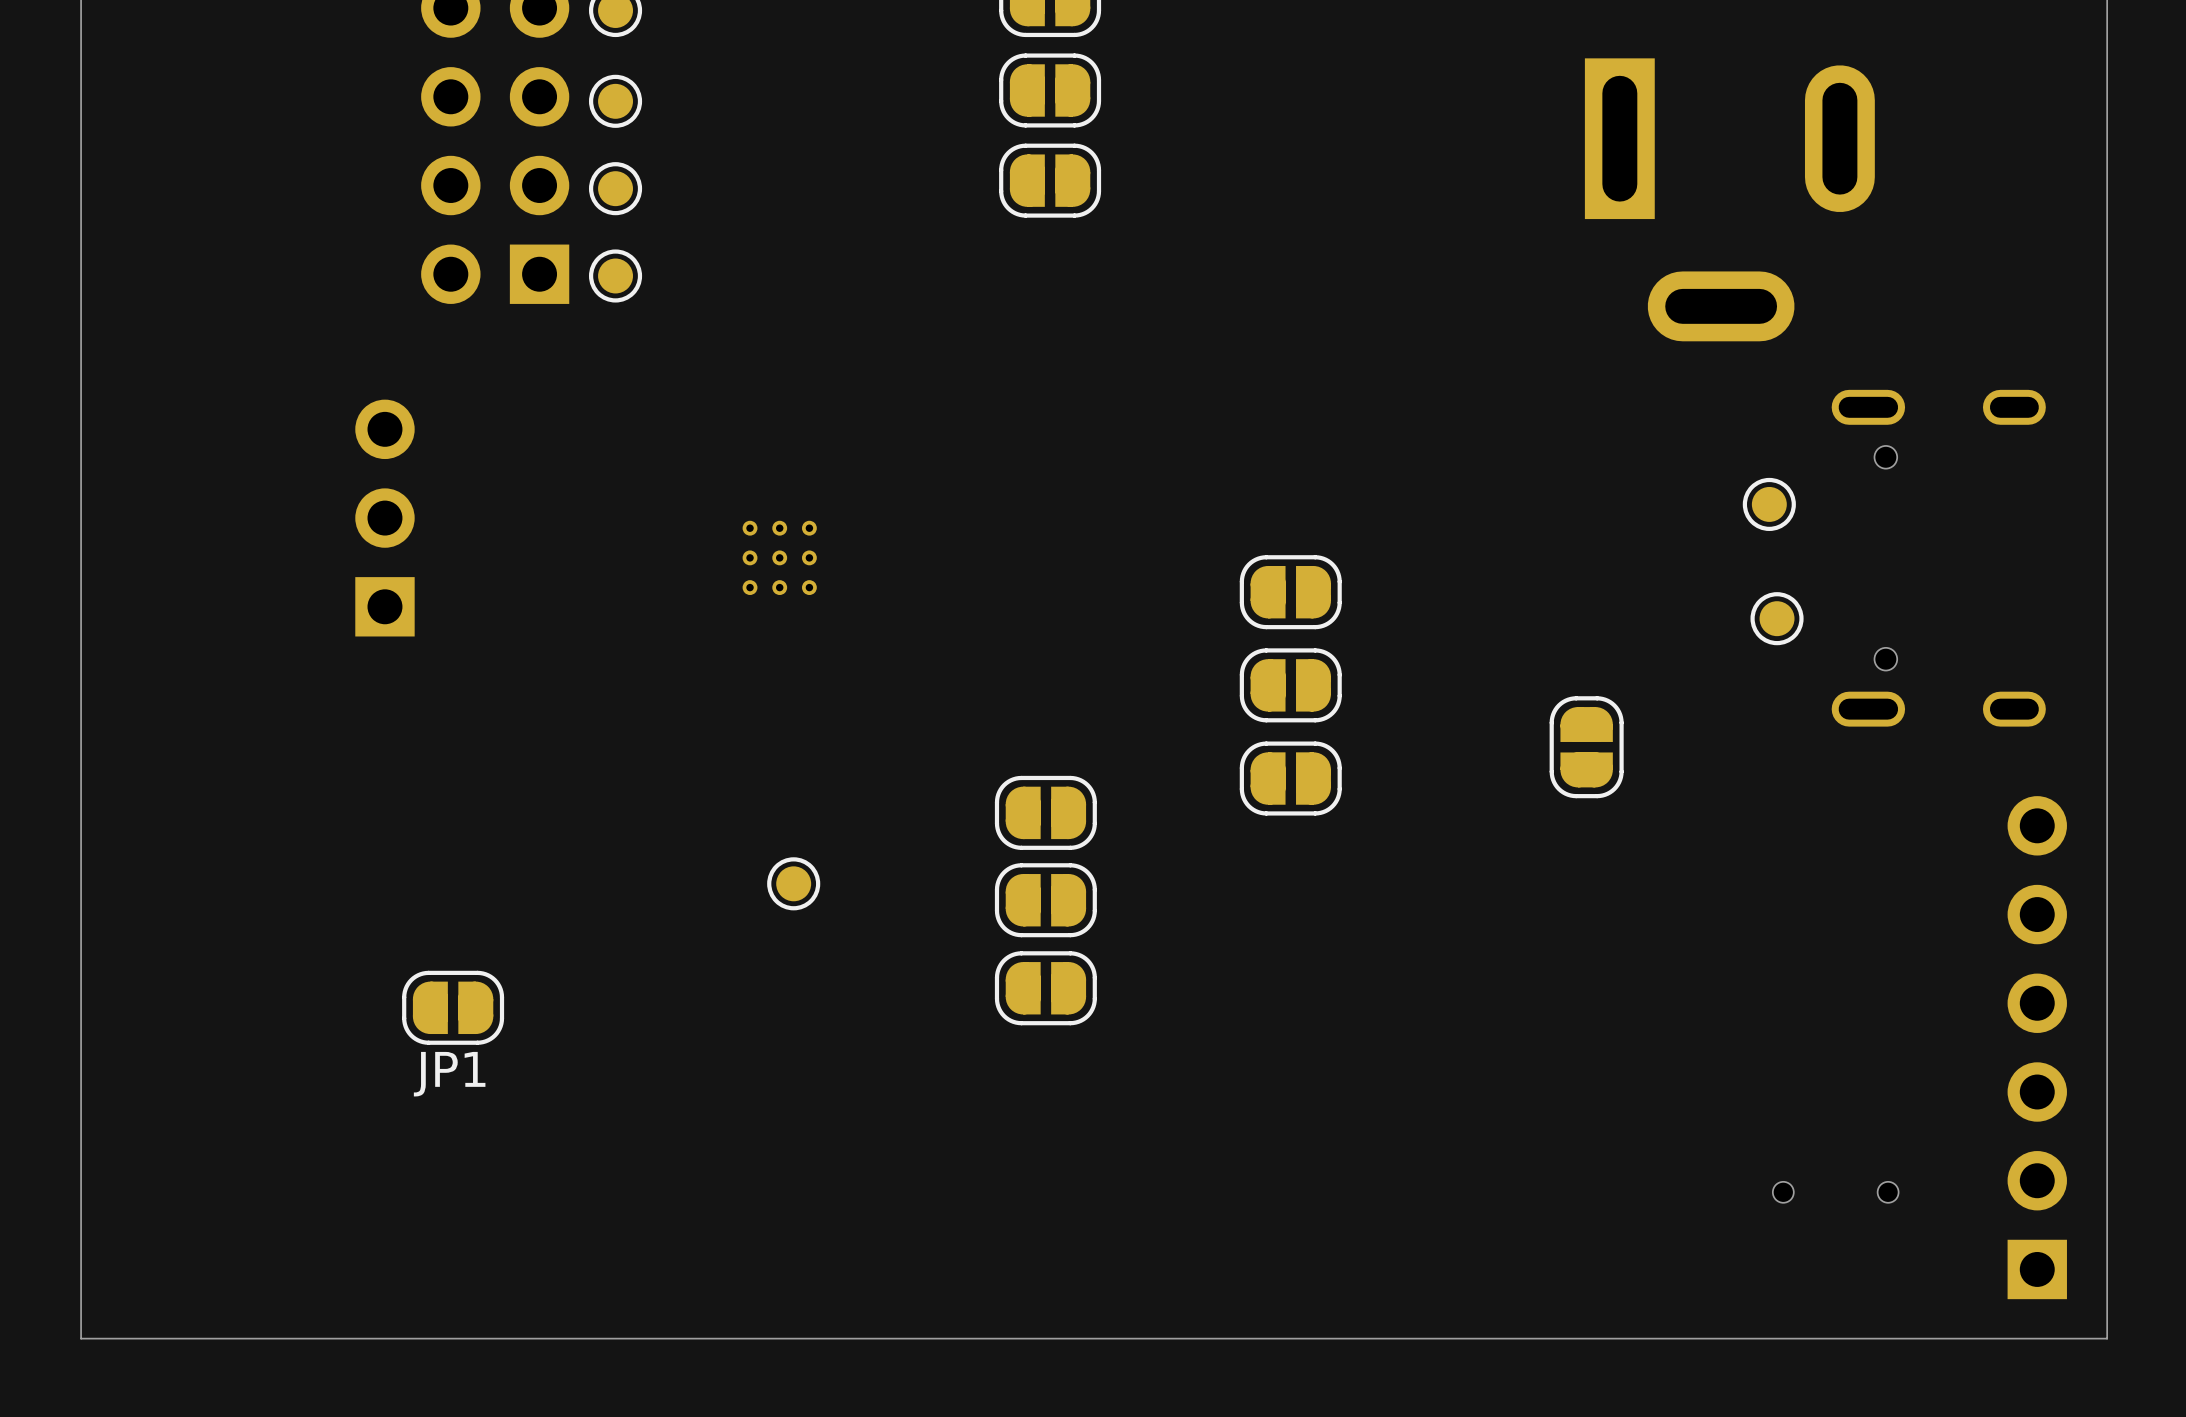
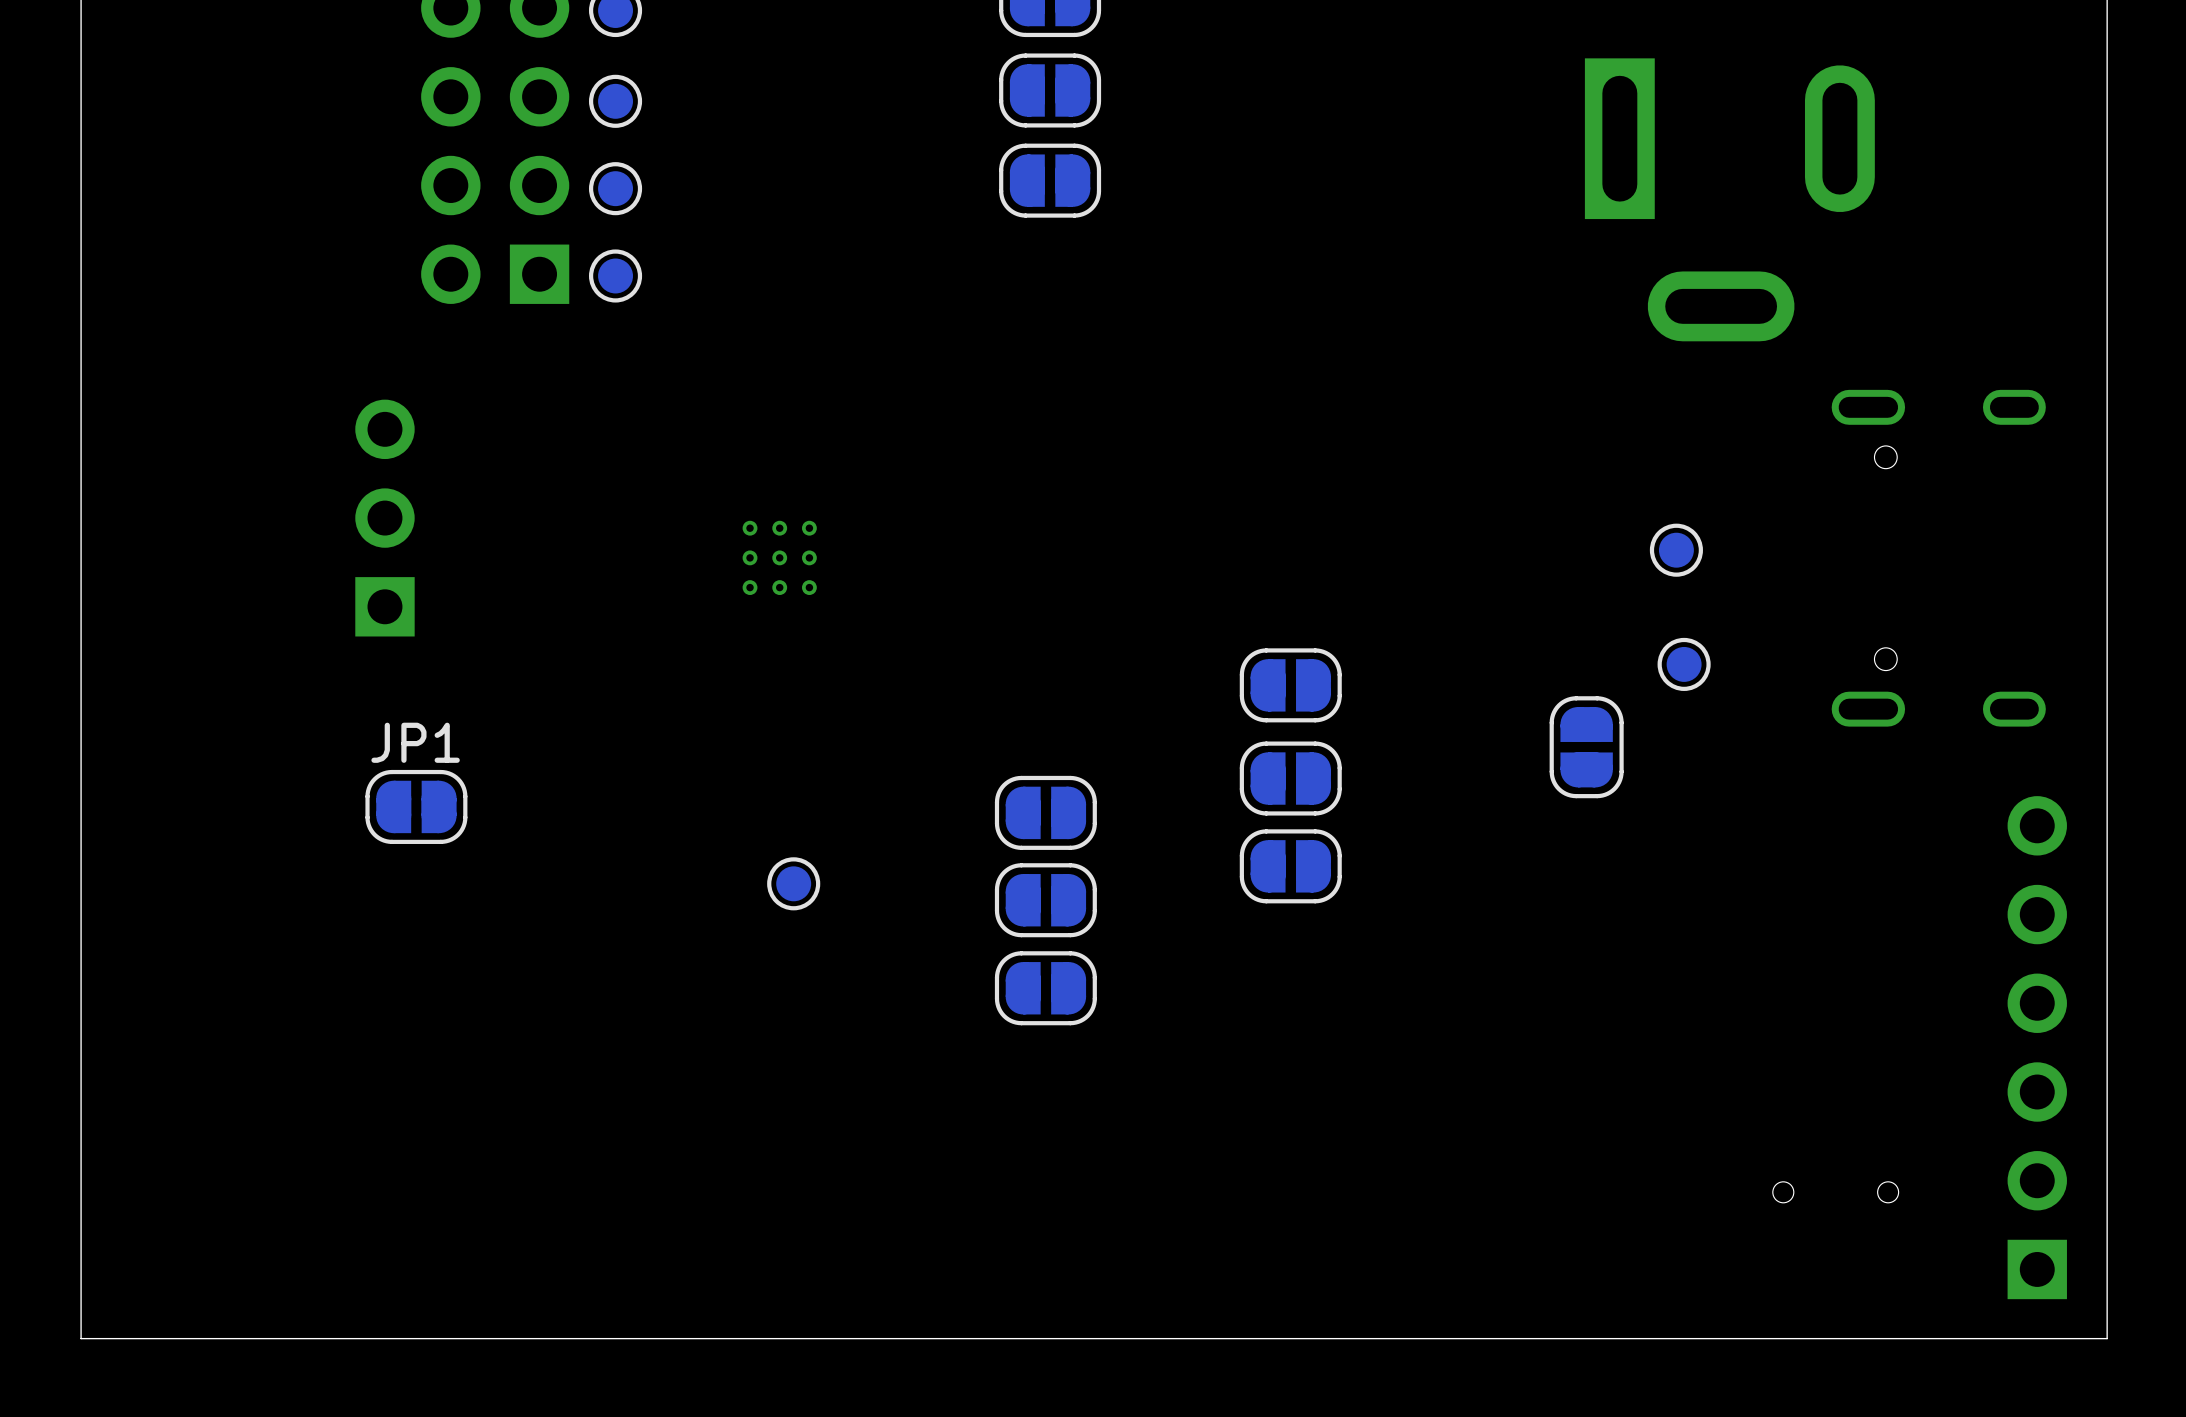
part: (1769, 504) -> none
part: none -> (1676, 550)
part position: (1290, 592) -> (1290, 866)
part: (1777, 618) -> none
part: none -> (1684, 664)
JP1 position: (453, 1007) -> (416, 806)
JP1 name position: JP1 (449, 1074) -> JP1 (415, 742)

